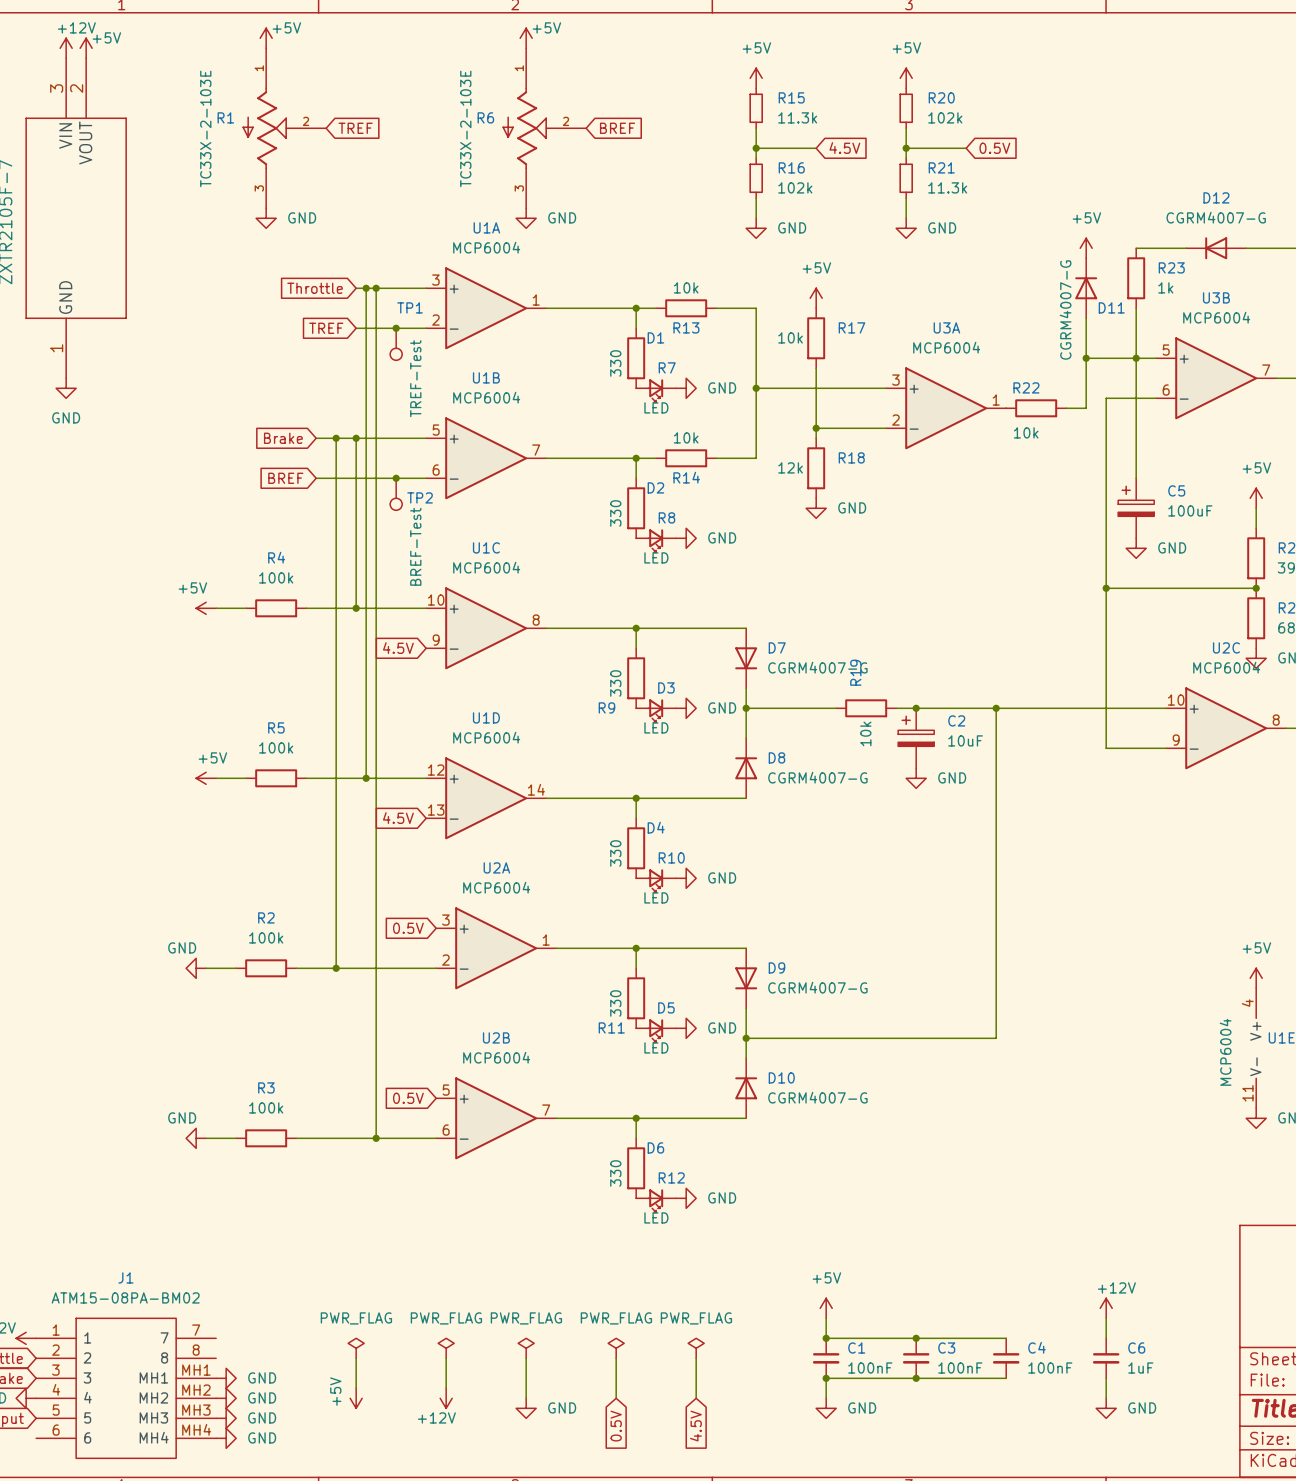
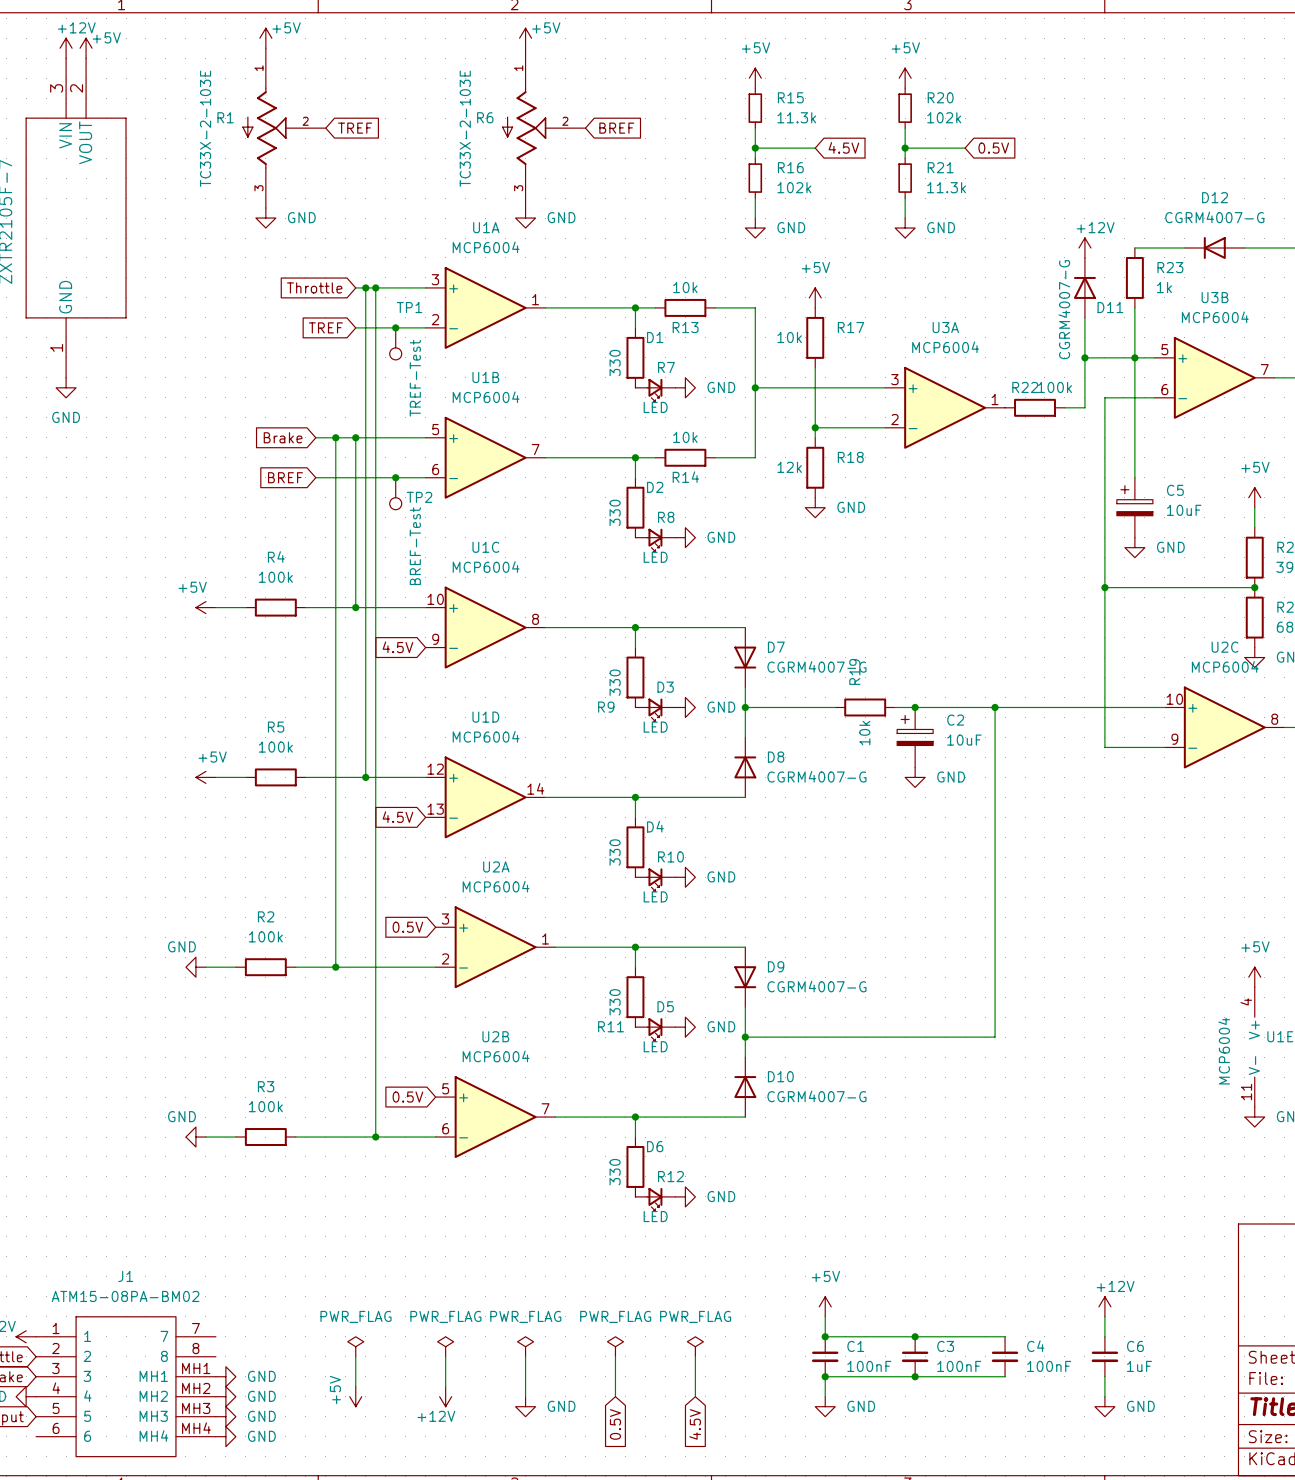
power symbol: +5V (1086, 248) -> +12V (1084, 247)
R22 value: 10k (1026, 432) -> 100k (1054, 387)
C5 value: 100uF (1190, 510) -> 10uF (1184, 510)

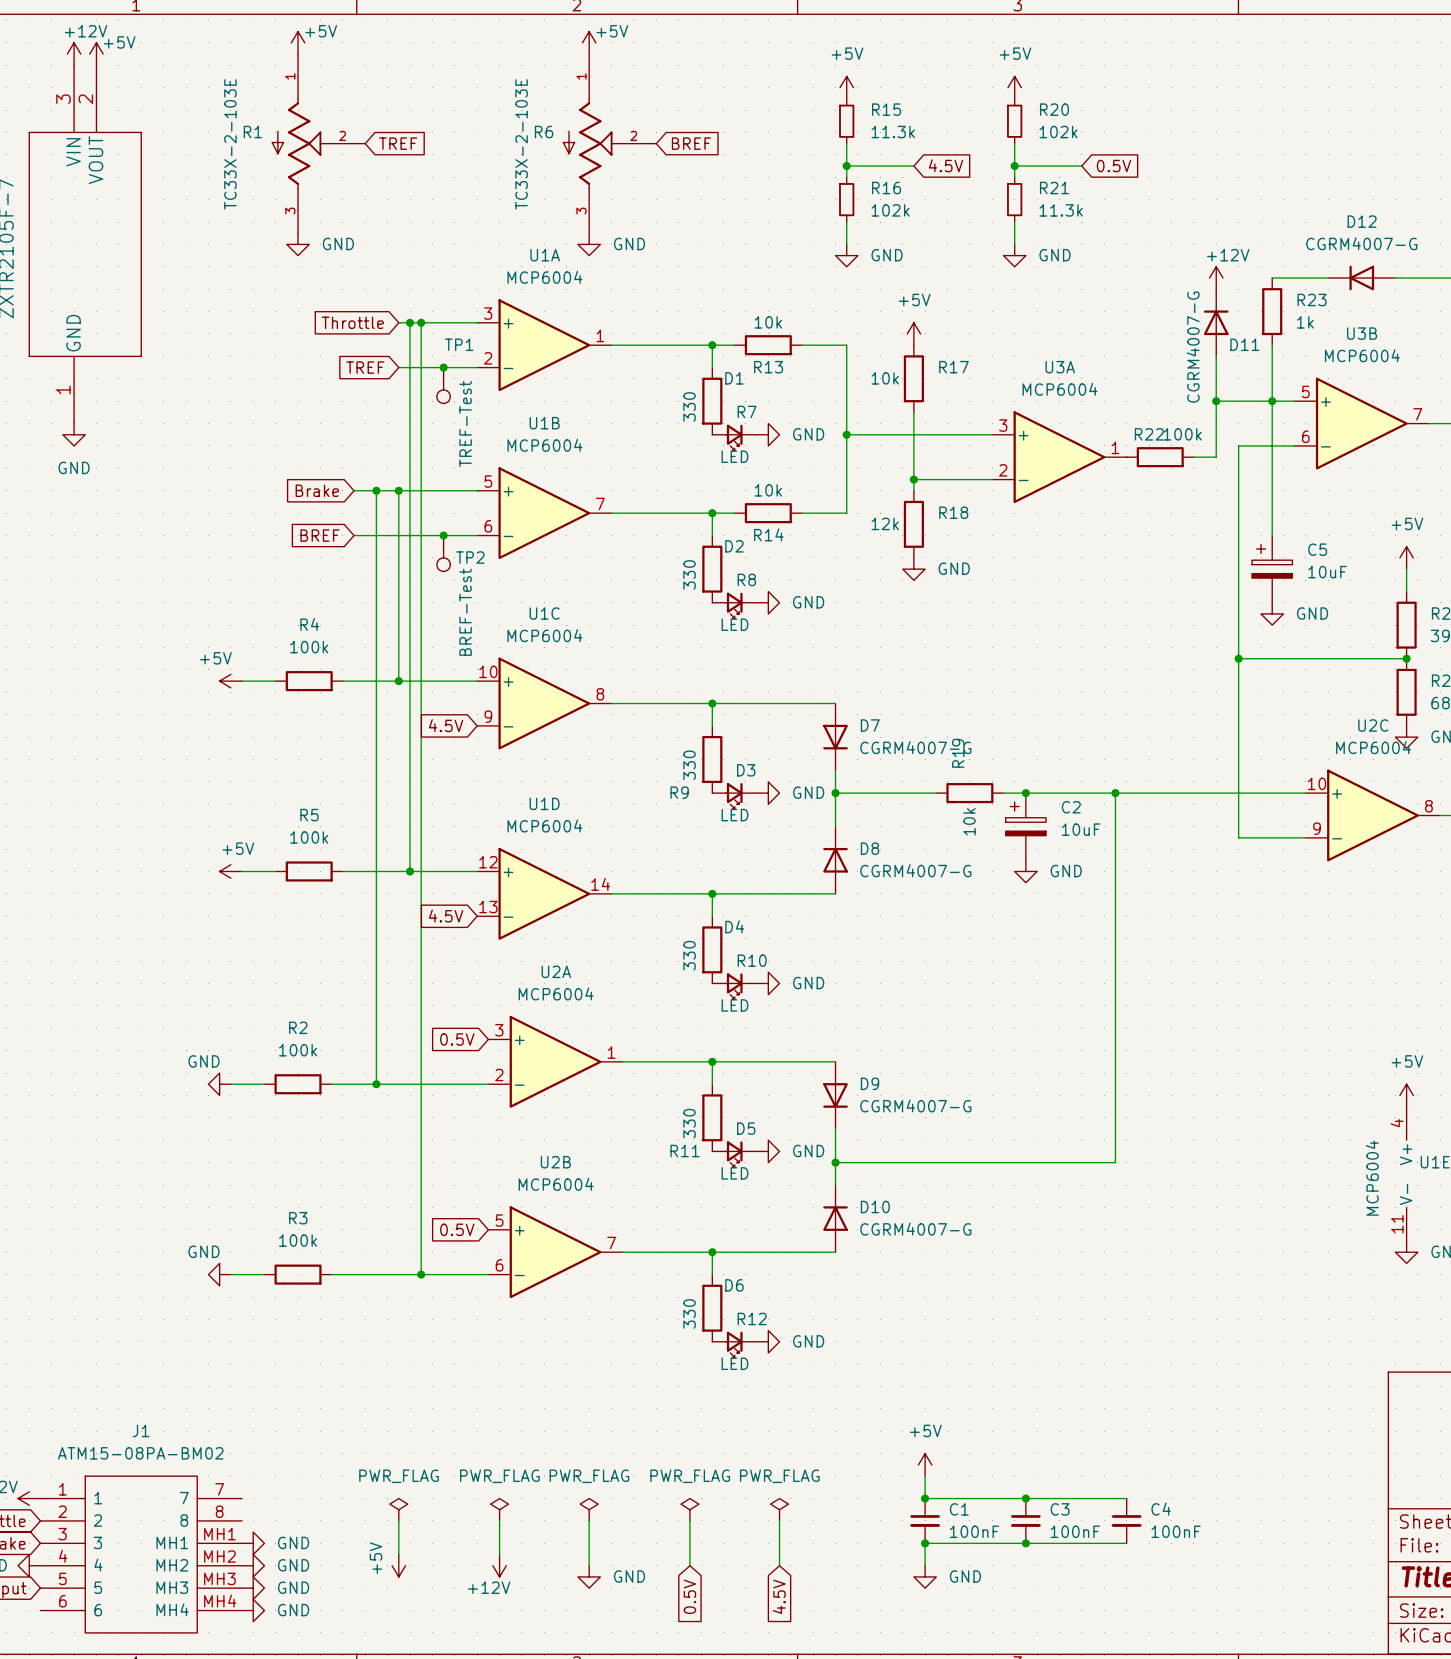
power symbol: +12V (1104, 1306) -> none
wire: (1104, 1316) (1104, 1336) -> none
C6: 1uF (1104, 1356) -> none
wire: (1104, 1376) (1104, 1396) -> none
power symbol: GND (1104, 1406) -> none

